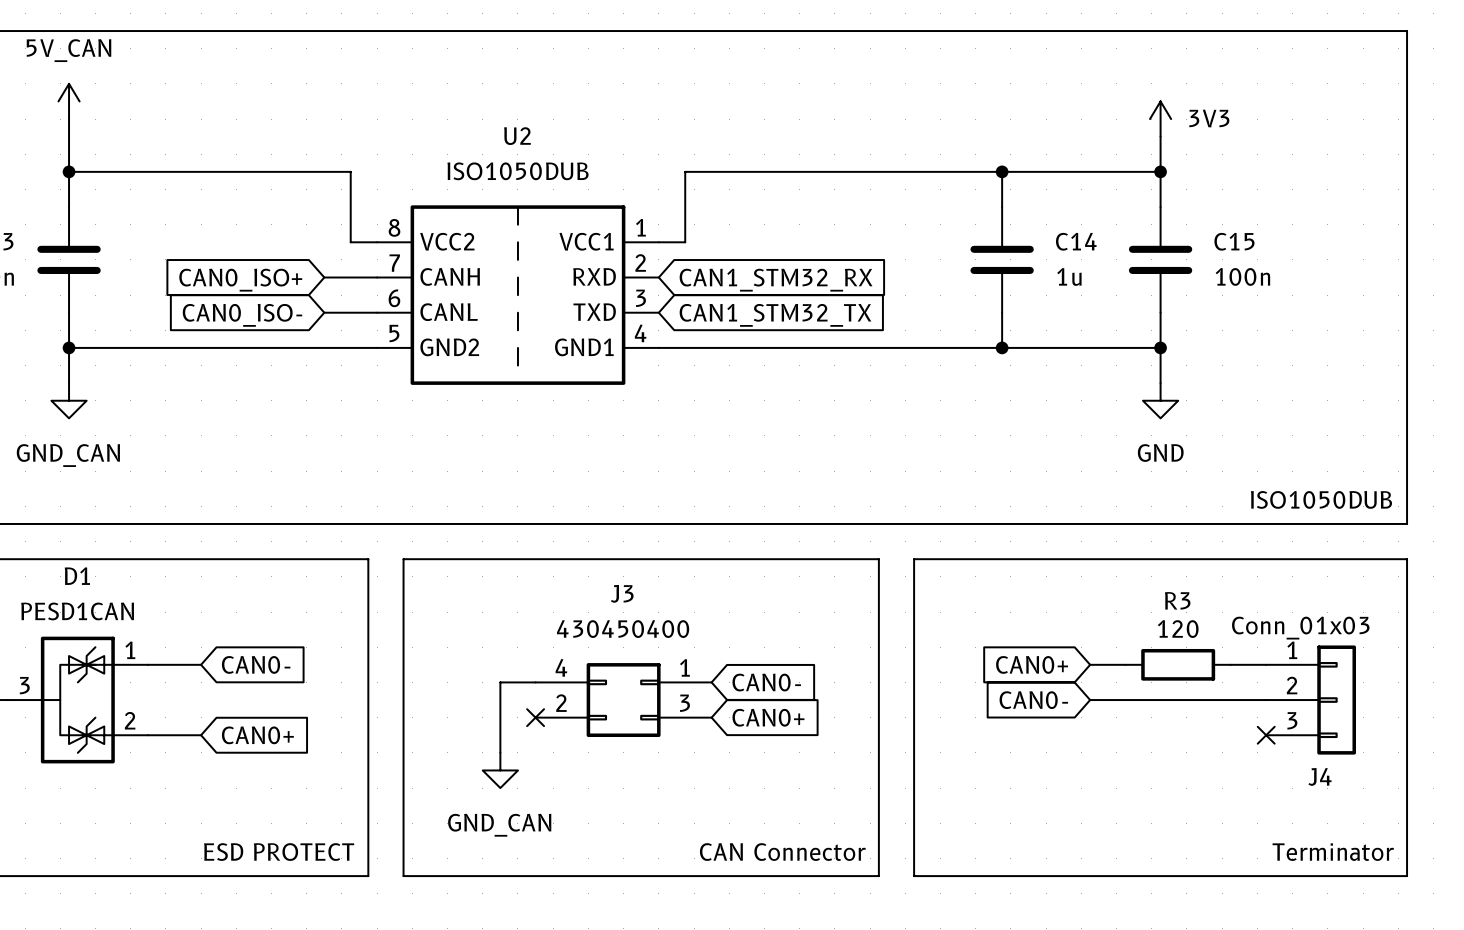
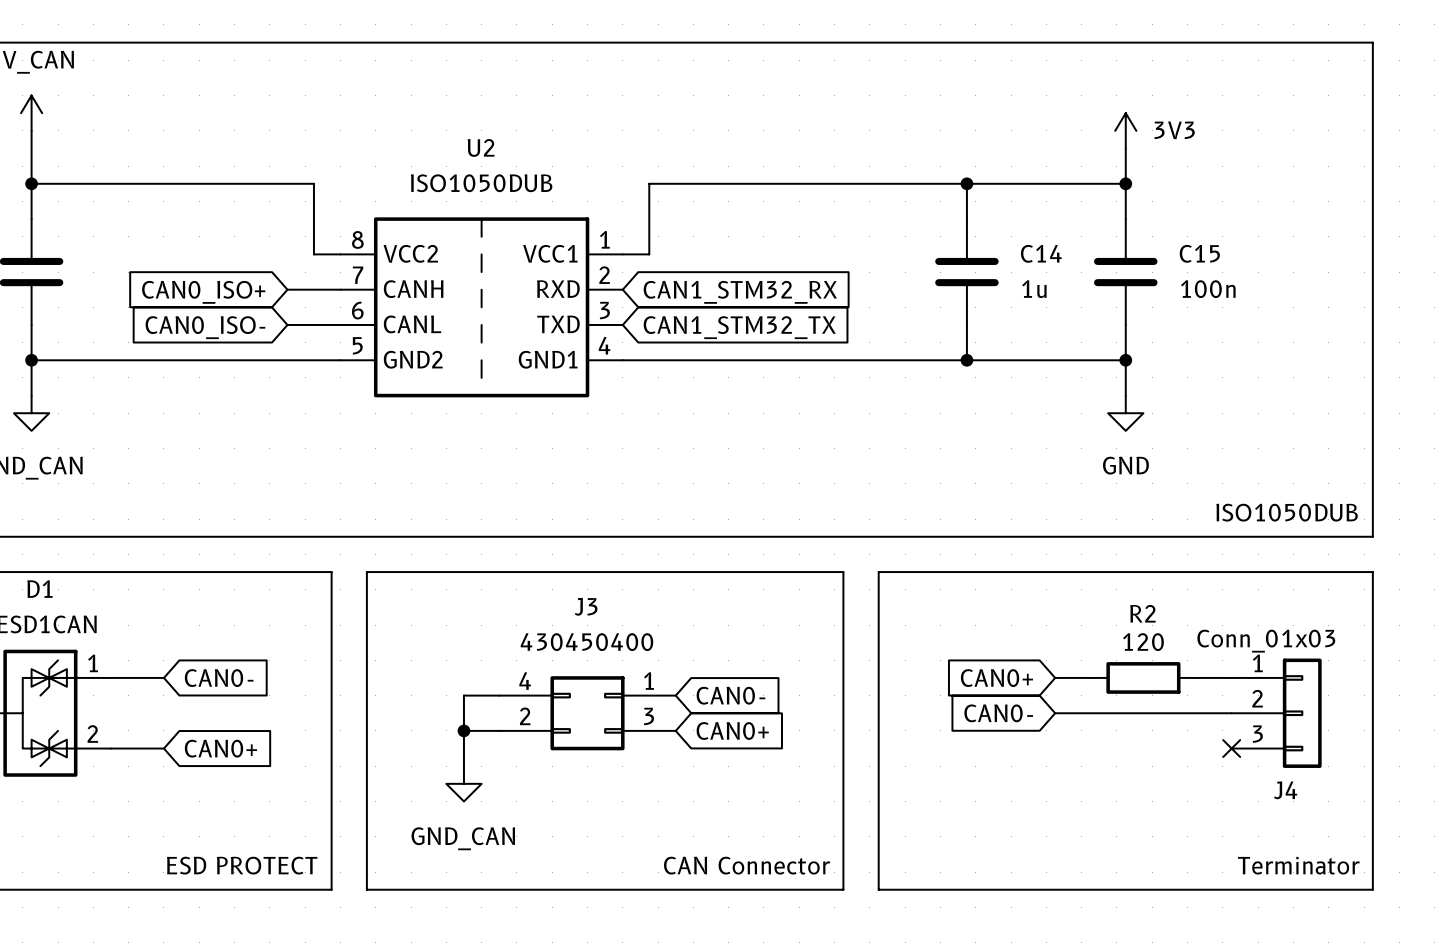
R3 name: R3 (1177, 600) -> R2 (1142, 613)
wire: none -> (463, 730) (499, 730)
junction: none -> (463, 730)
no-connect mark: (535, 717) -> none

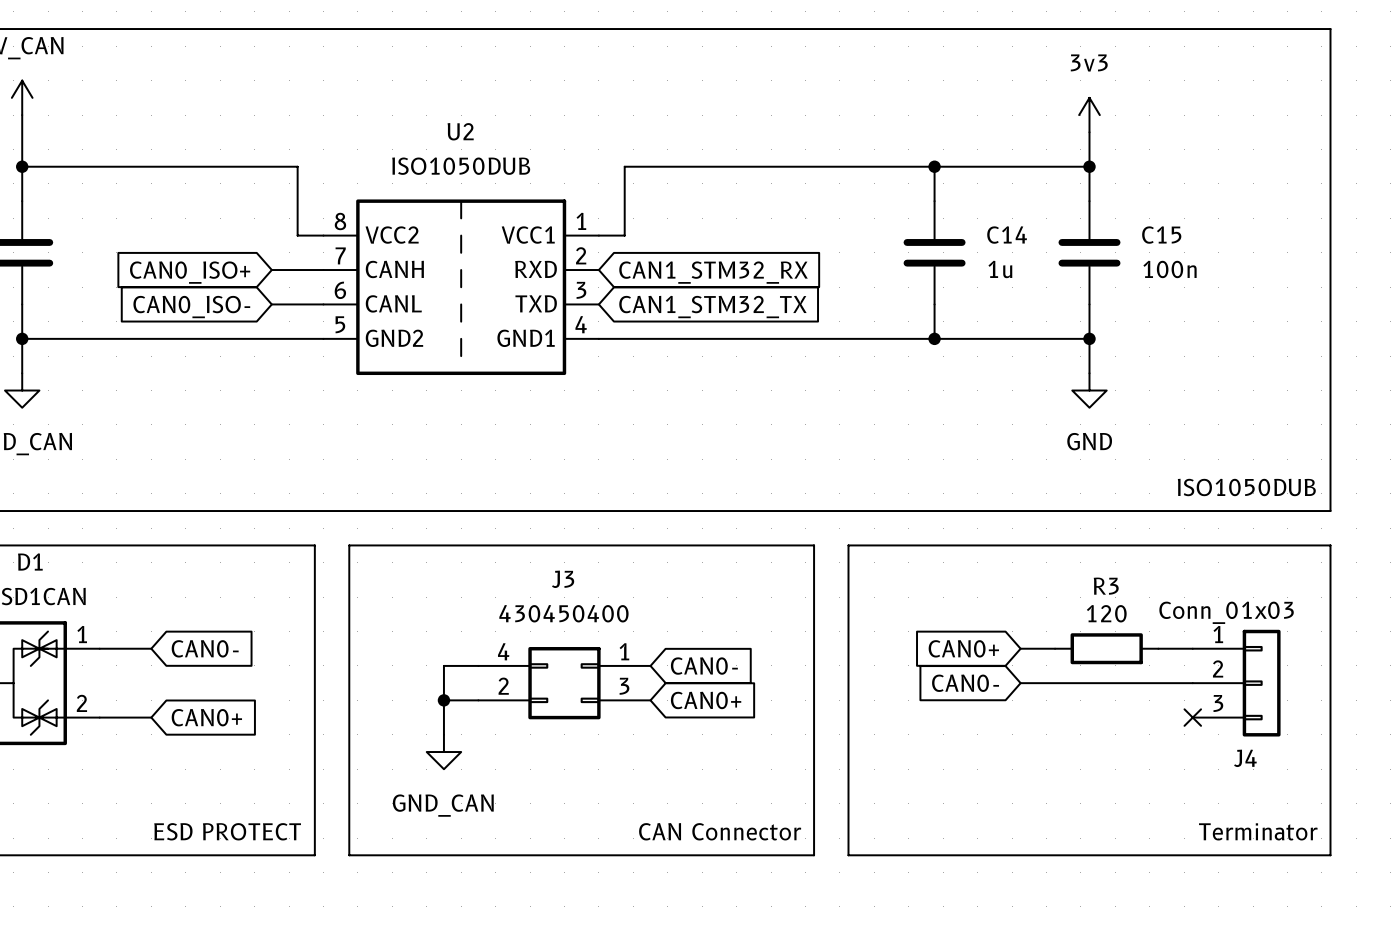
power symbol: 3V3 (1125, 130) -> 3v3 (1089, 115)
R2 name: R2 (1142, 613) -> R3 (1106, 586)

